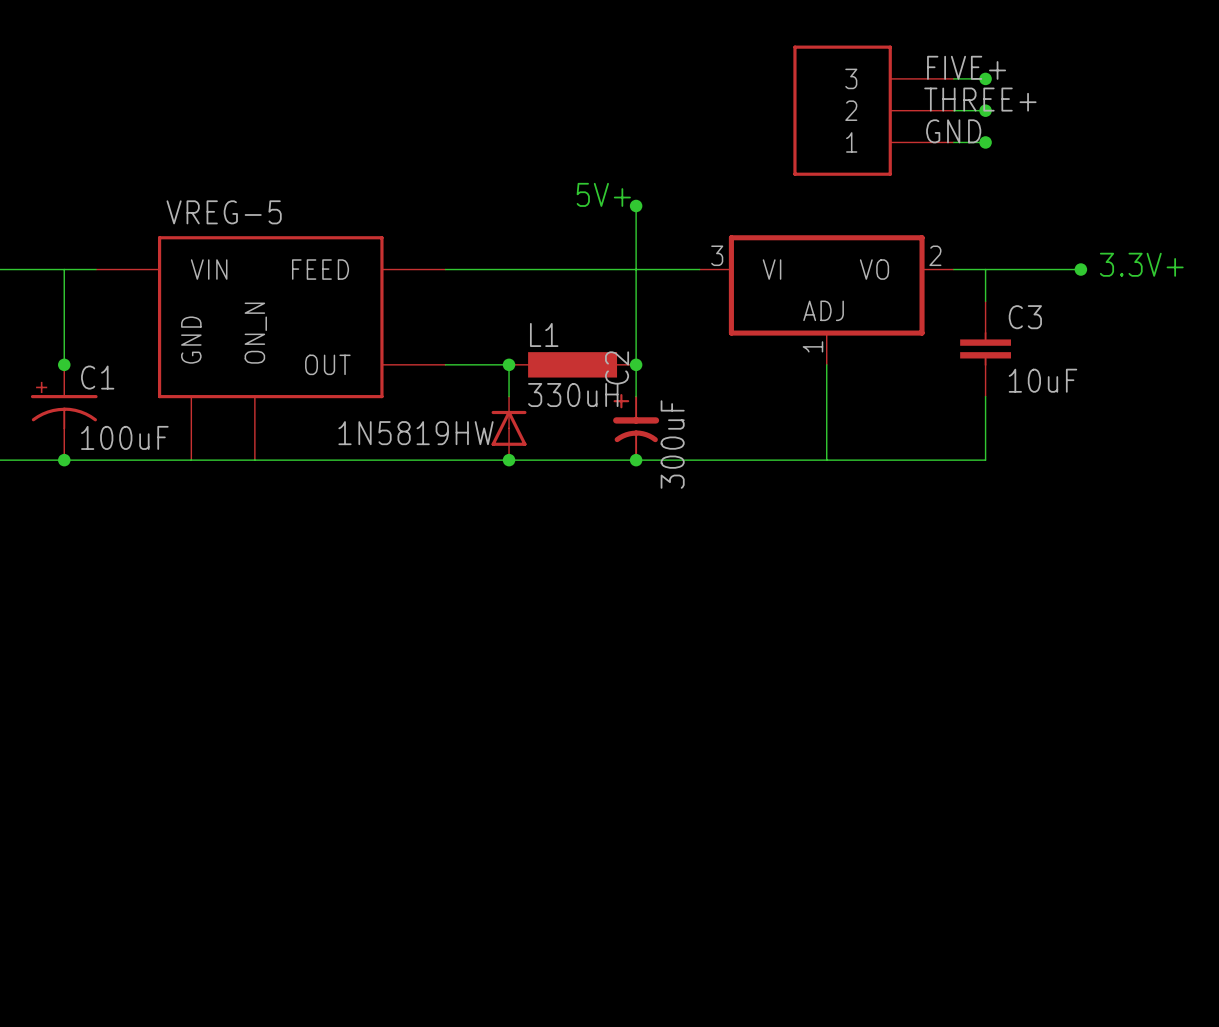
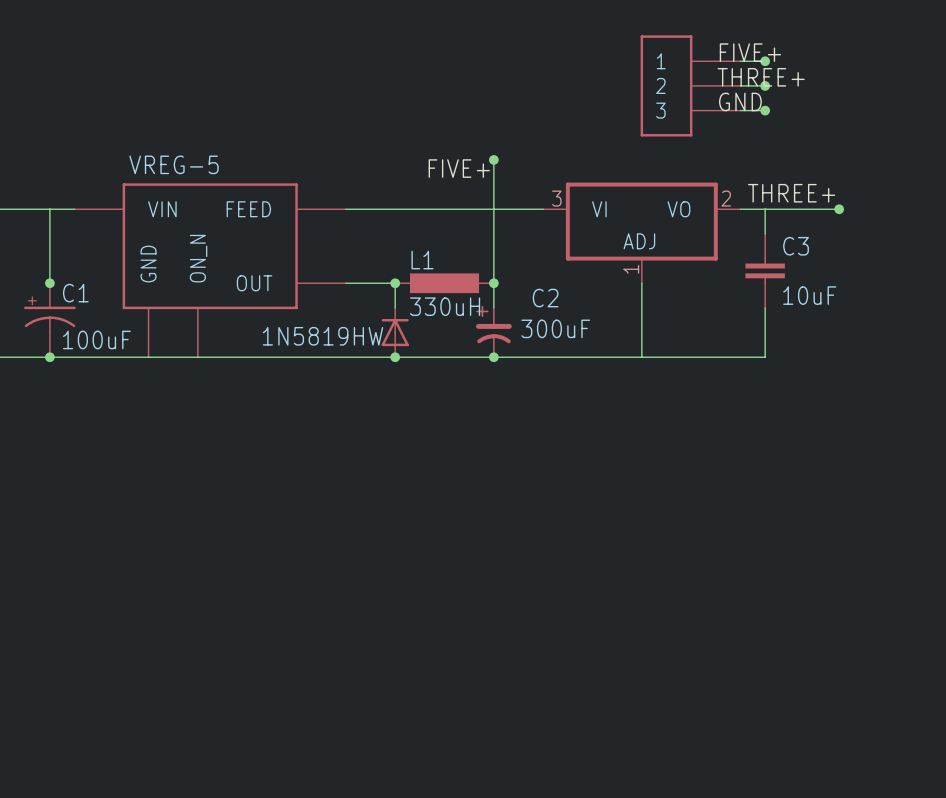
part: (873, 110) -> none
part: none -> (690, 85)
text: 5V+ (603, 194) -> none
label: none -> FIVE+ (459, 168)
label: none -> THREE+ (791, 193)
text: 3.3V+ (1141, 264) -> none
C2 name rotation: 0° (617, 367) -> 90° clockwise (545, 298)
C2 name position: C2 (617, 367) -> C2 (545, 298)
C2 value rotation: 0° (672, 444) -> 90° clockwise (555, 328)

